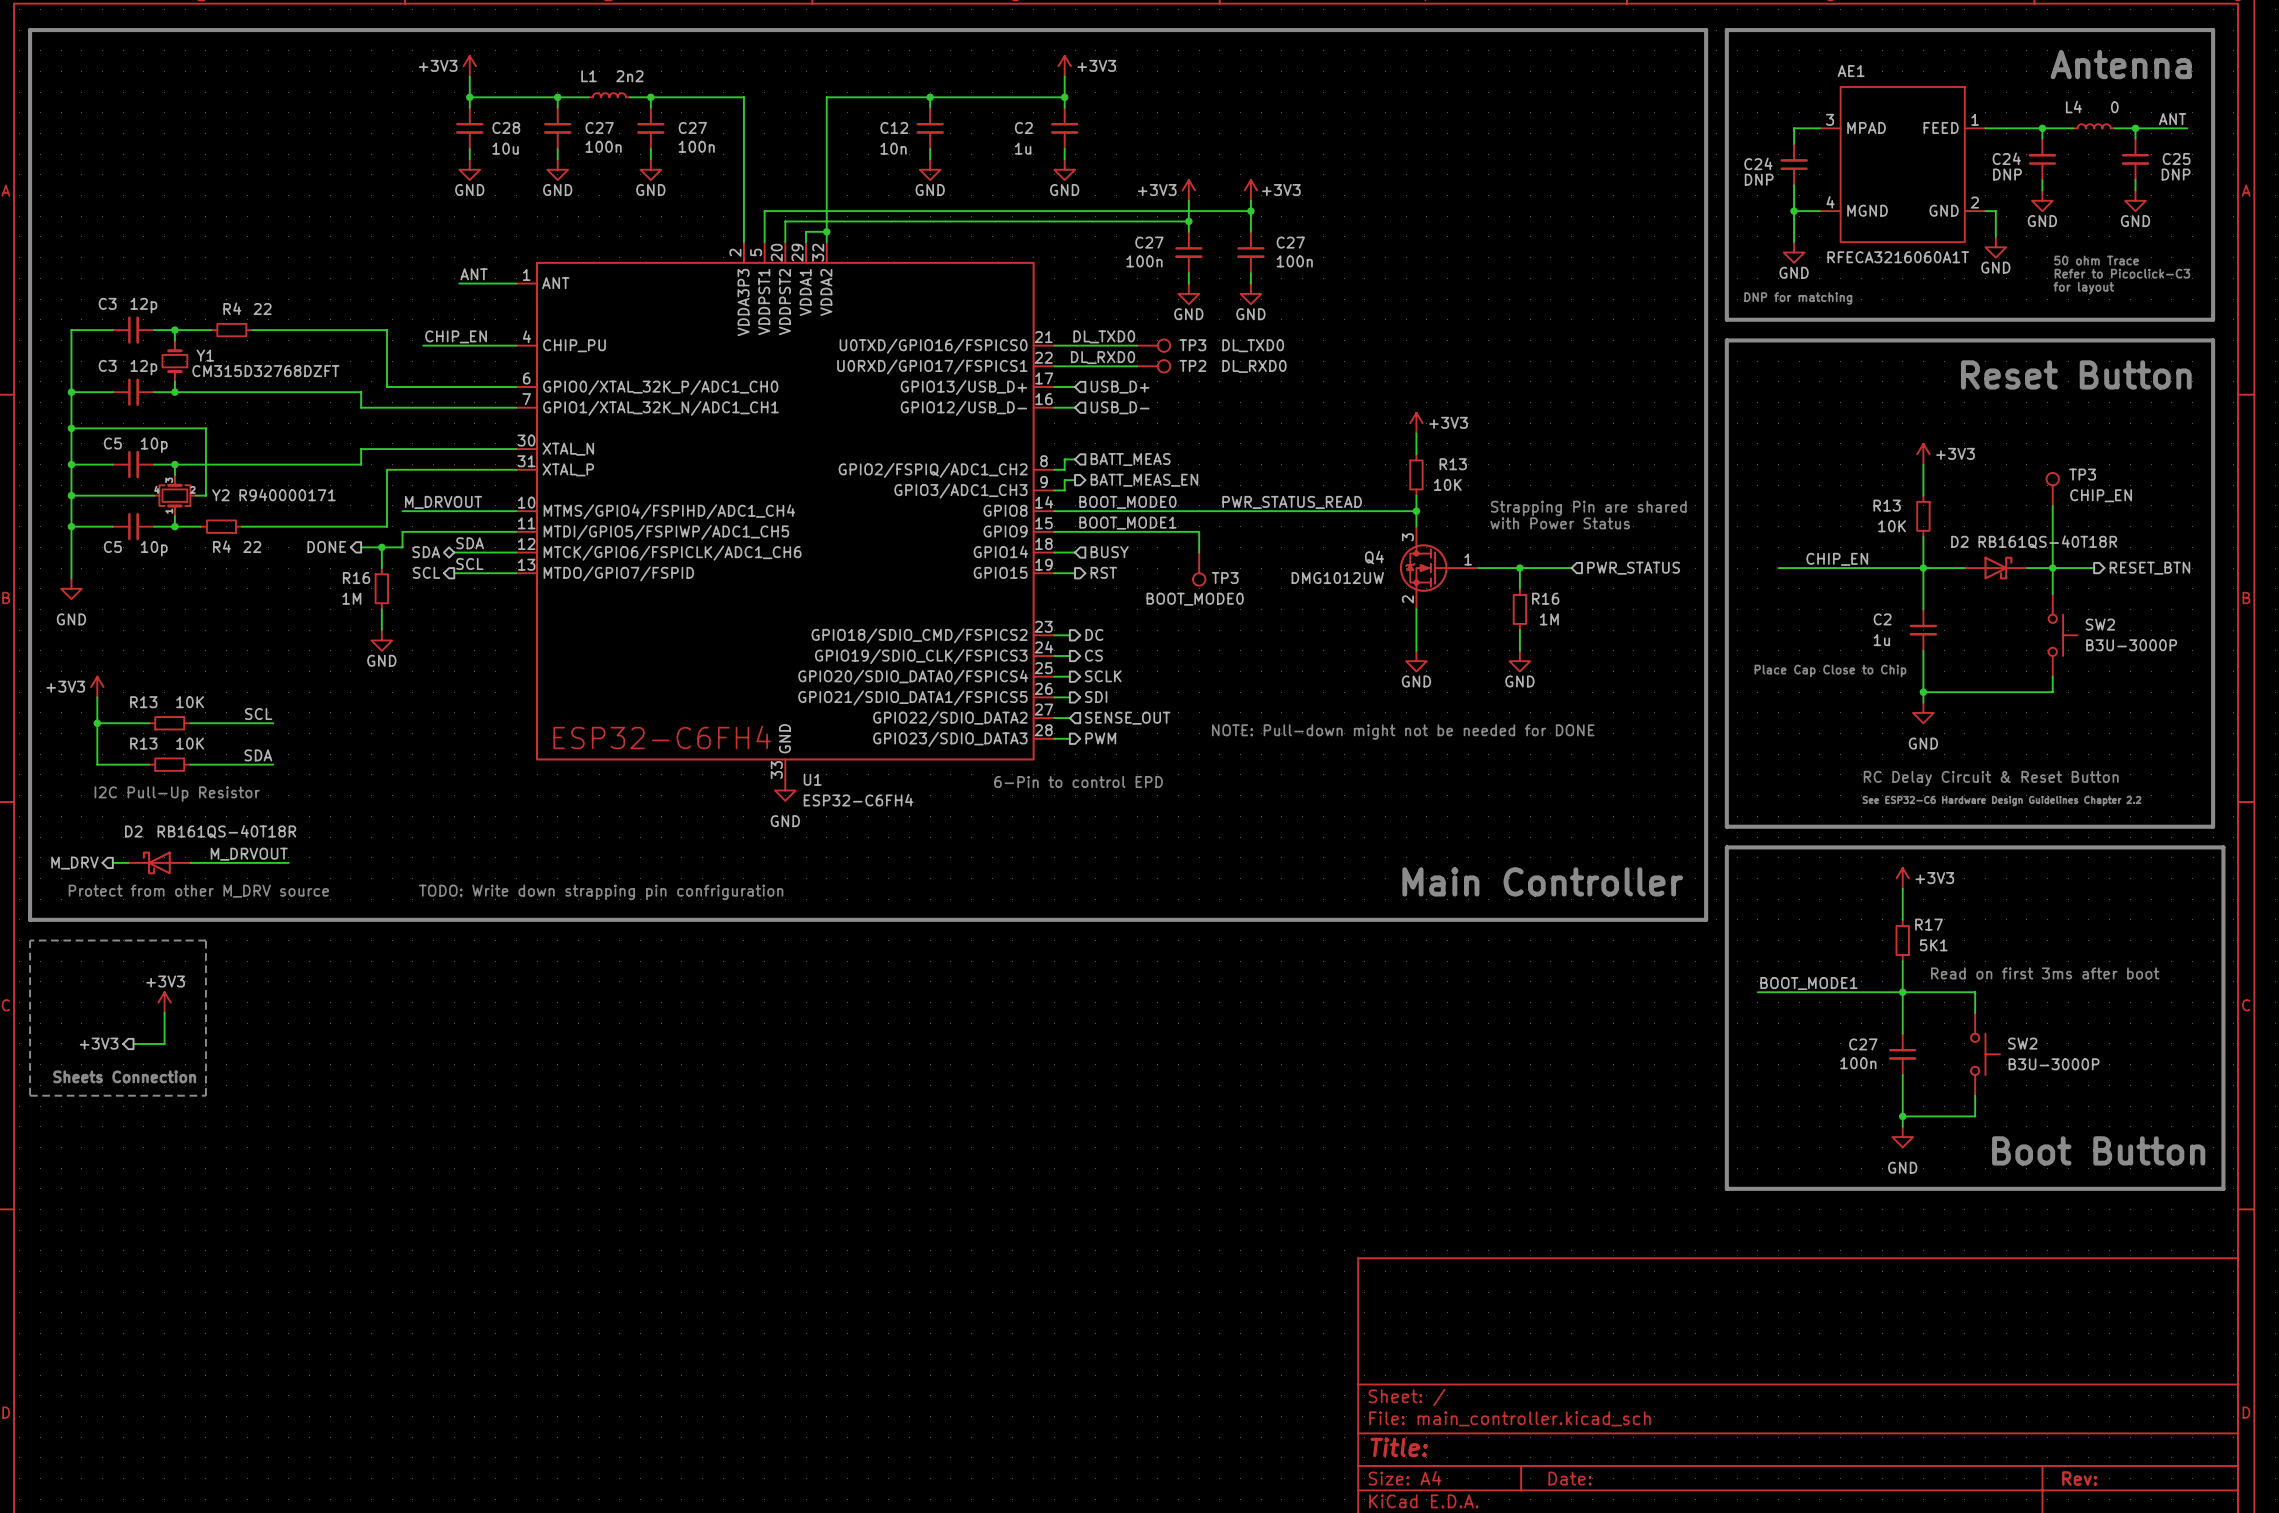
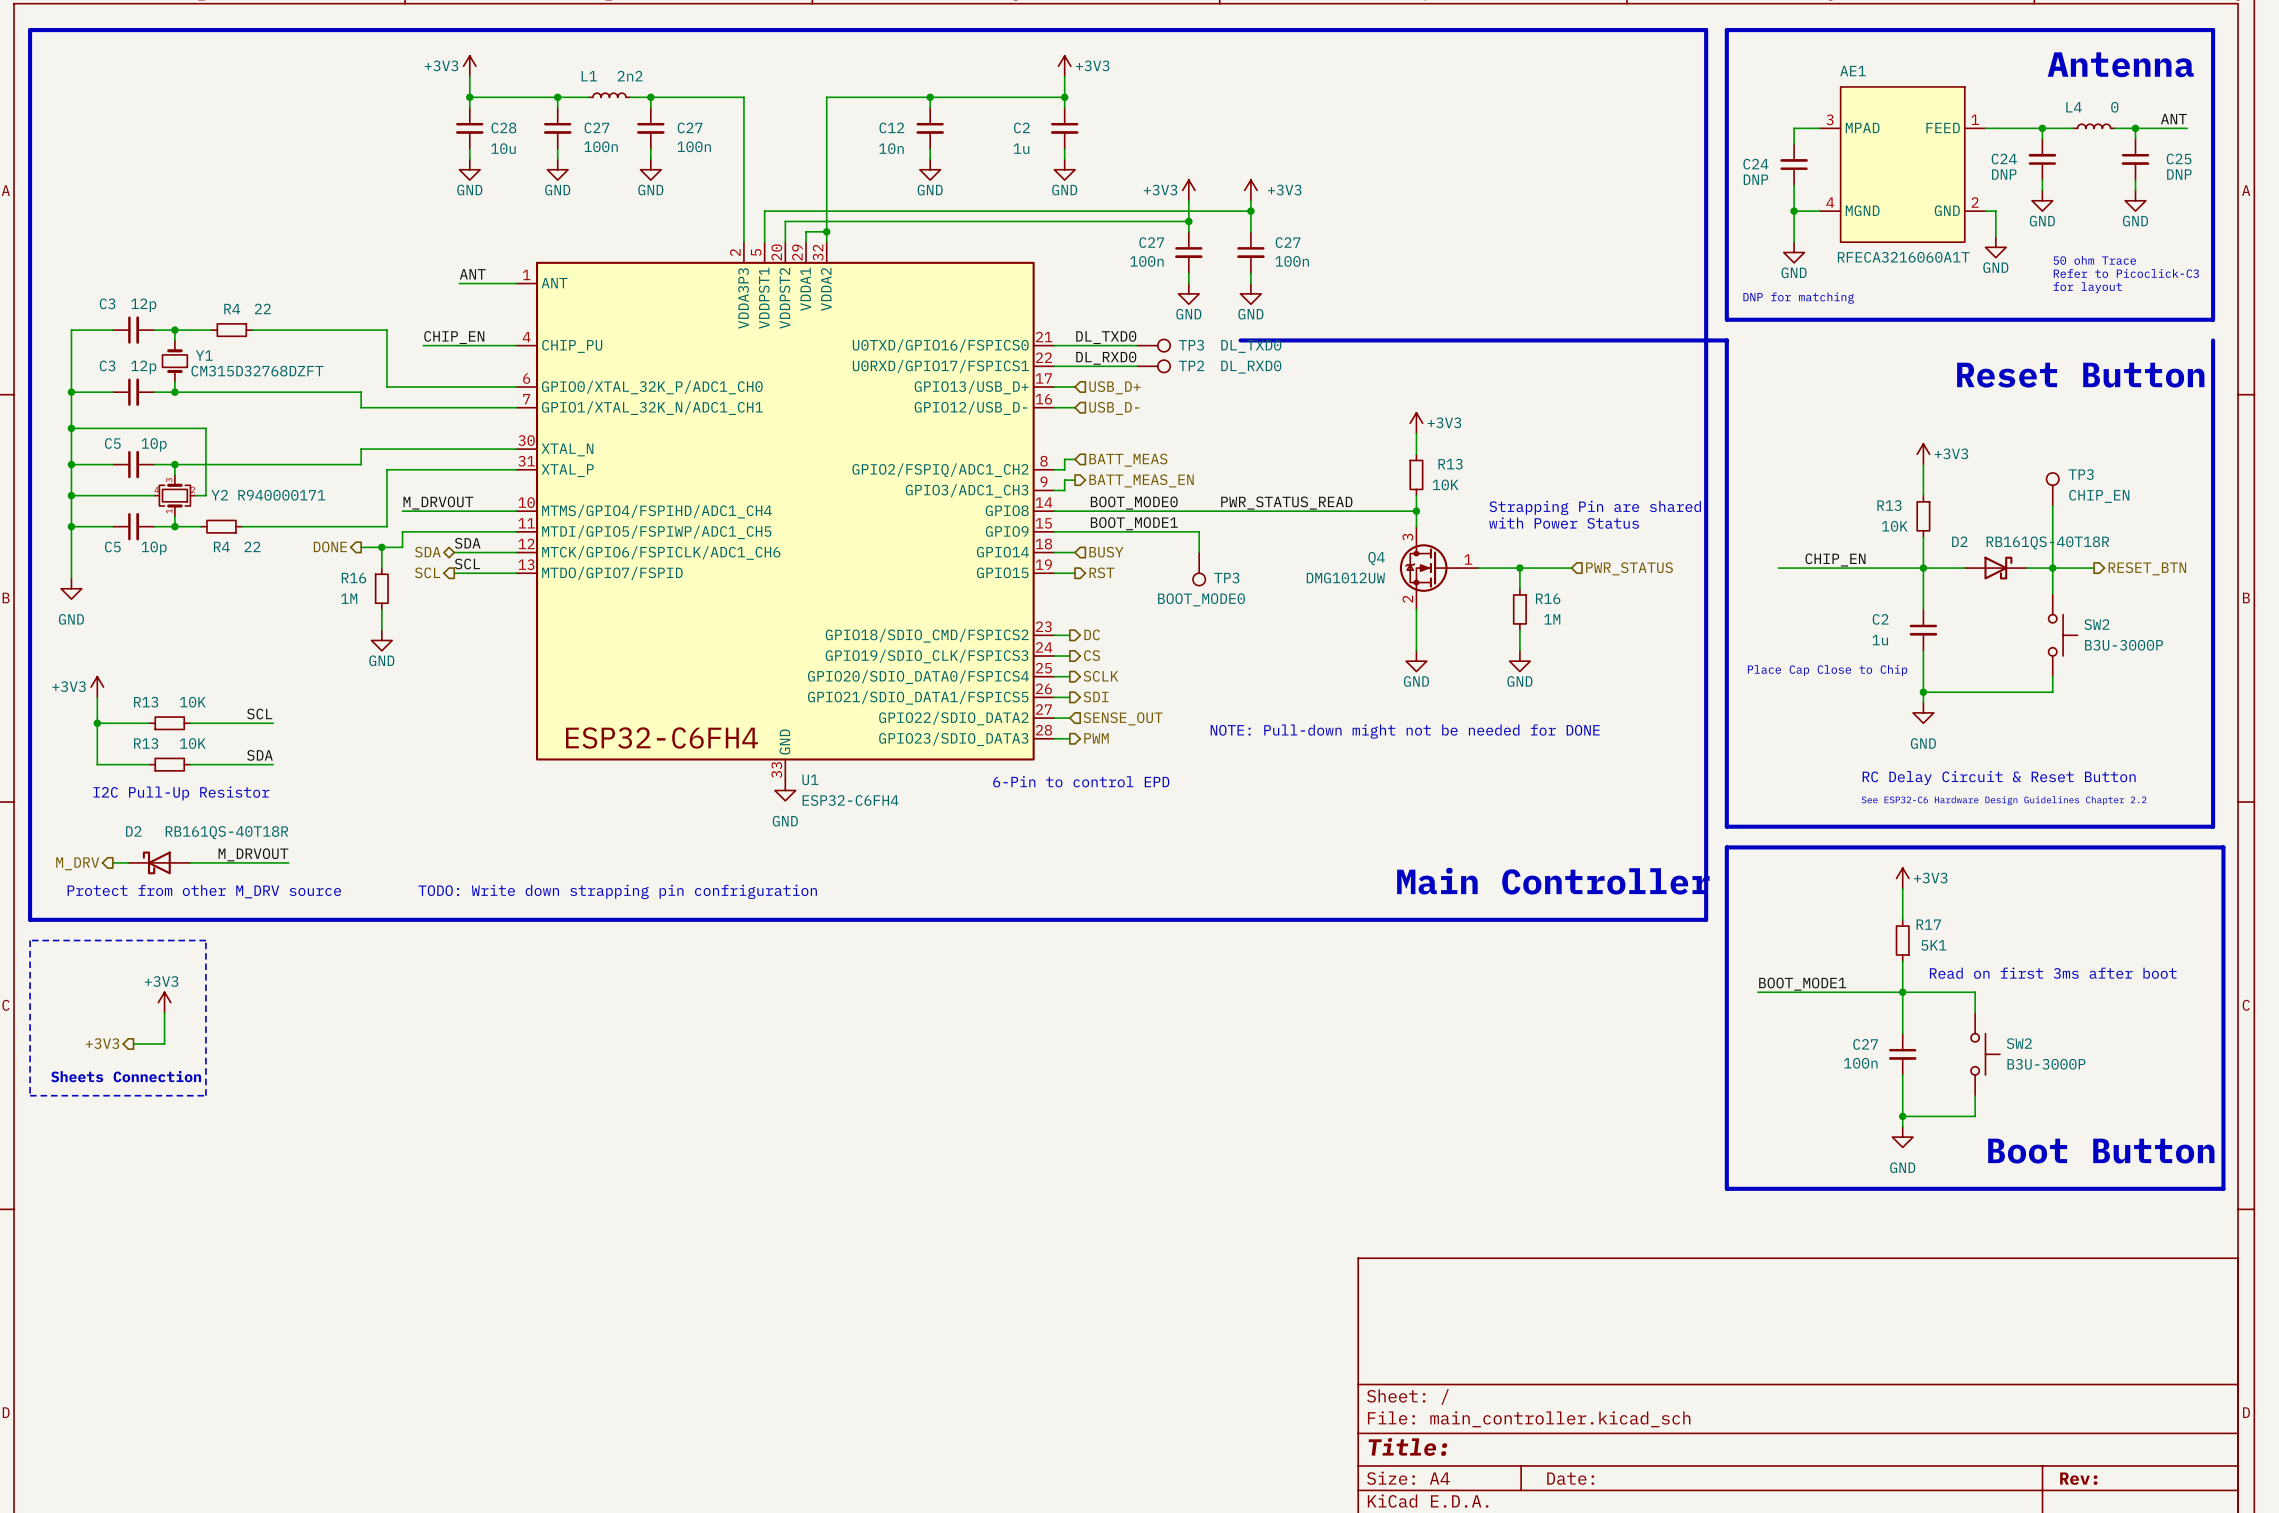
line: (1726, 340) (2213, 340) -> (1726, 340) (1240, 340)

